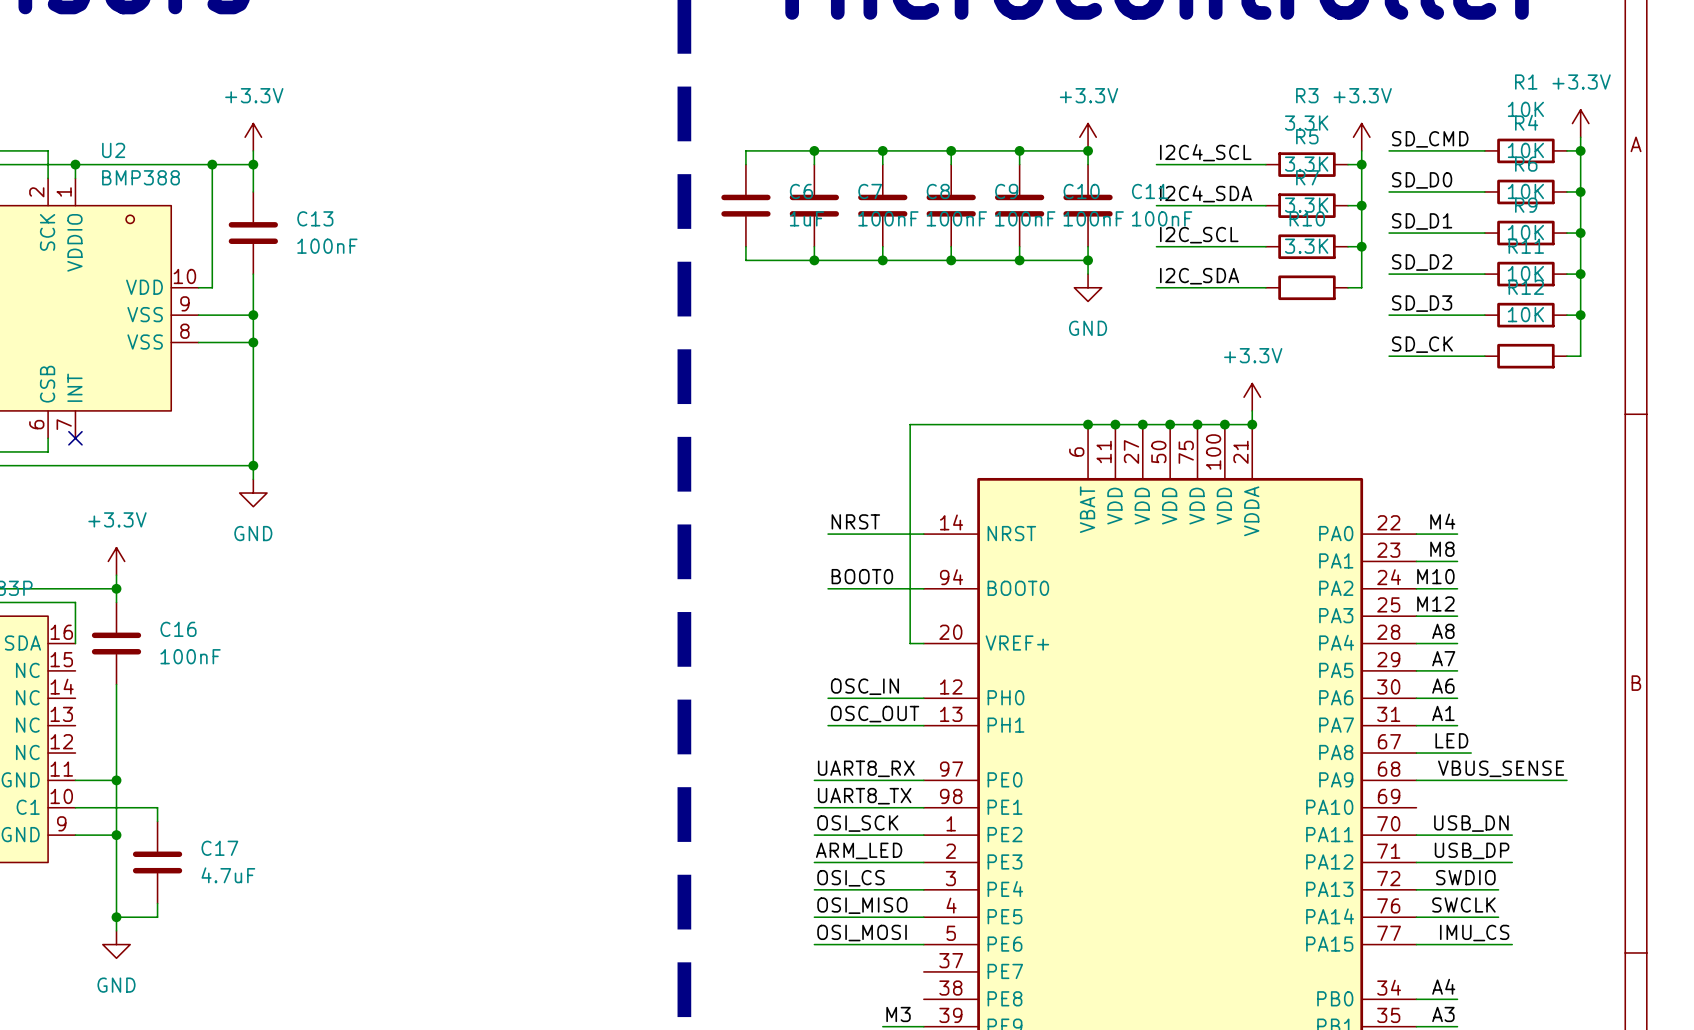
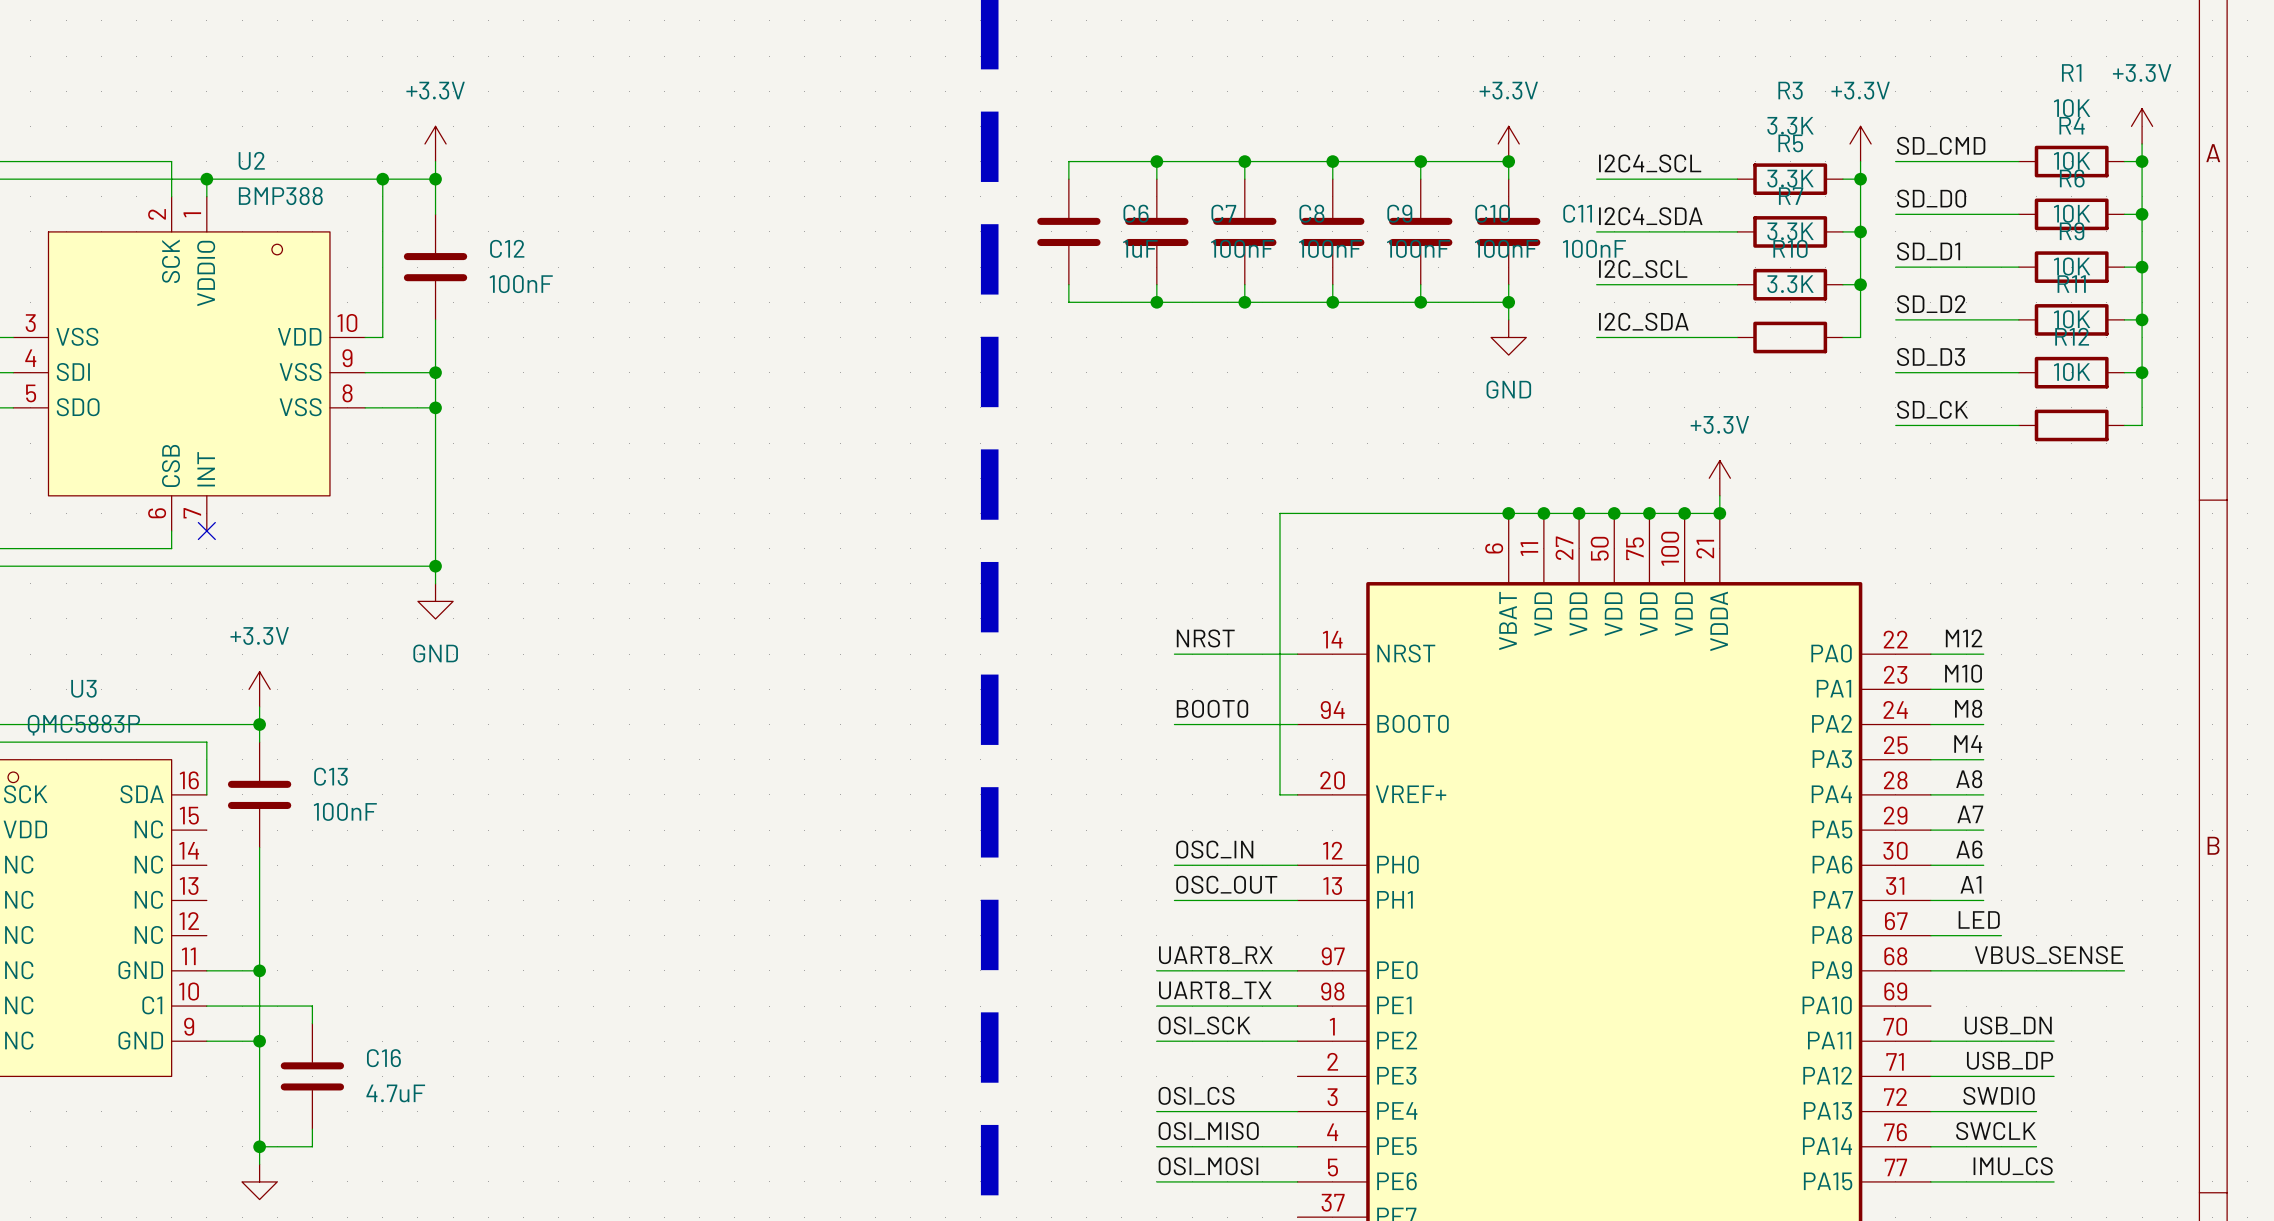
C13 name: C13 (315, 218) -> C12 (507, 248)
label: M4 (1442, 521) -> M12 (1964, 638)
label: M8 (1442, 549) -> M10 (1963, 673)
label: M10 (1435, 576) -> M8 (1968, 708)
label: M12 (1435, 603) -> M4 (1968, 744)
C16 name: C16 (178, 629) -> C13 (330, 776)
C17 name: C17 (219, 848) -> C16 (383, 1058)
label: ARM_LED (859, 850) -> none
wire: (814, 862) (923, 862) -> none

